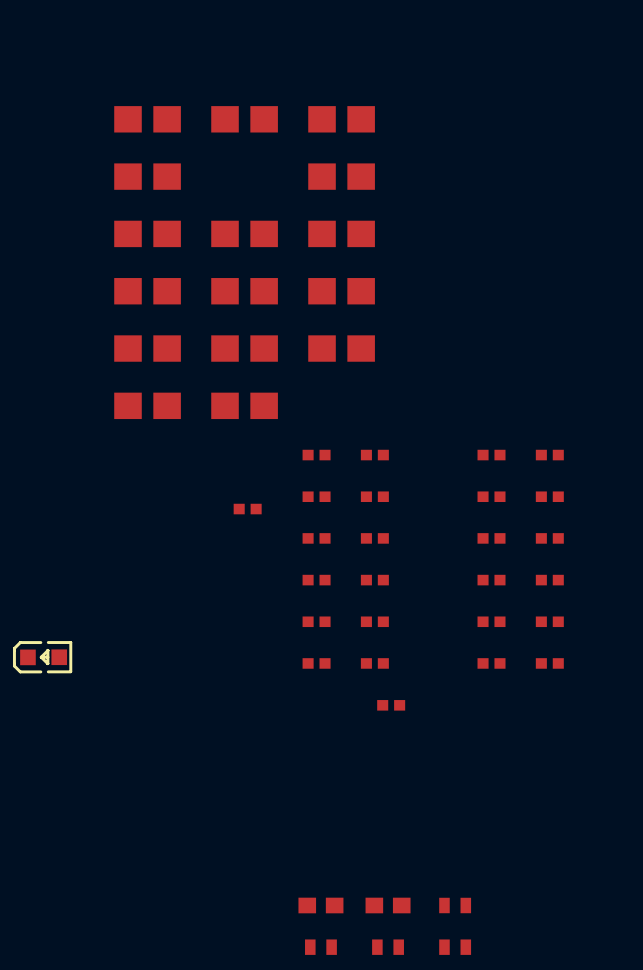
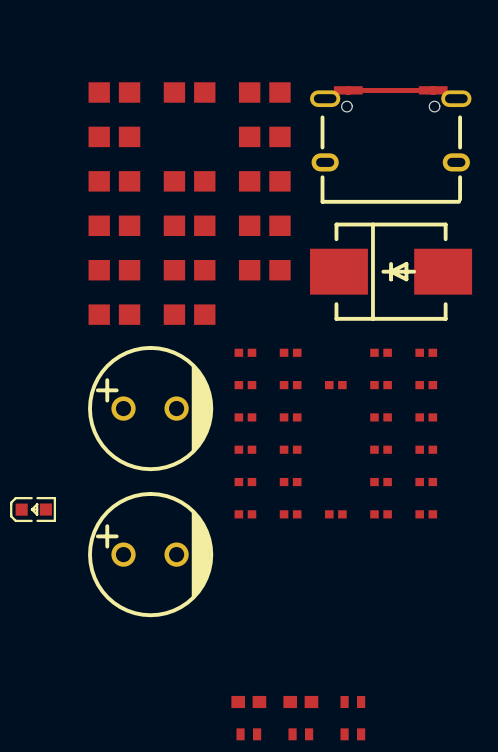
part: none -> (390, 144)
part: none -> (391, 271)
part: none -> (335, 385)
part: (247, 509) -> none
part: none -> (150, 408)
part position: (391, 705) -> (335, 514)
part: none -> (150, 554)

